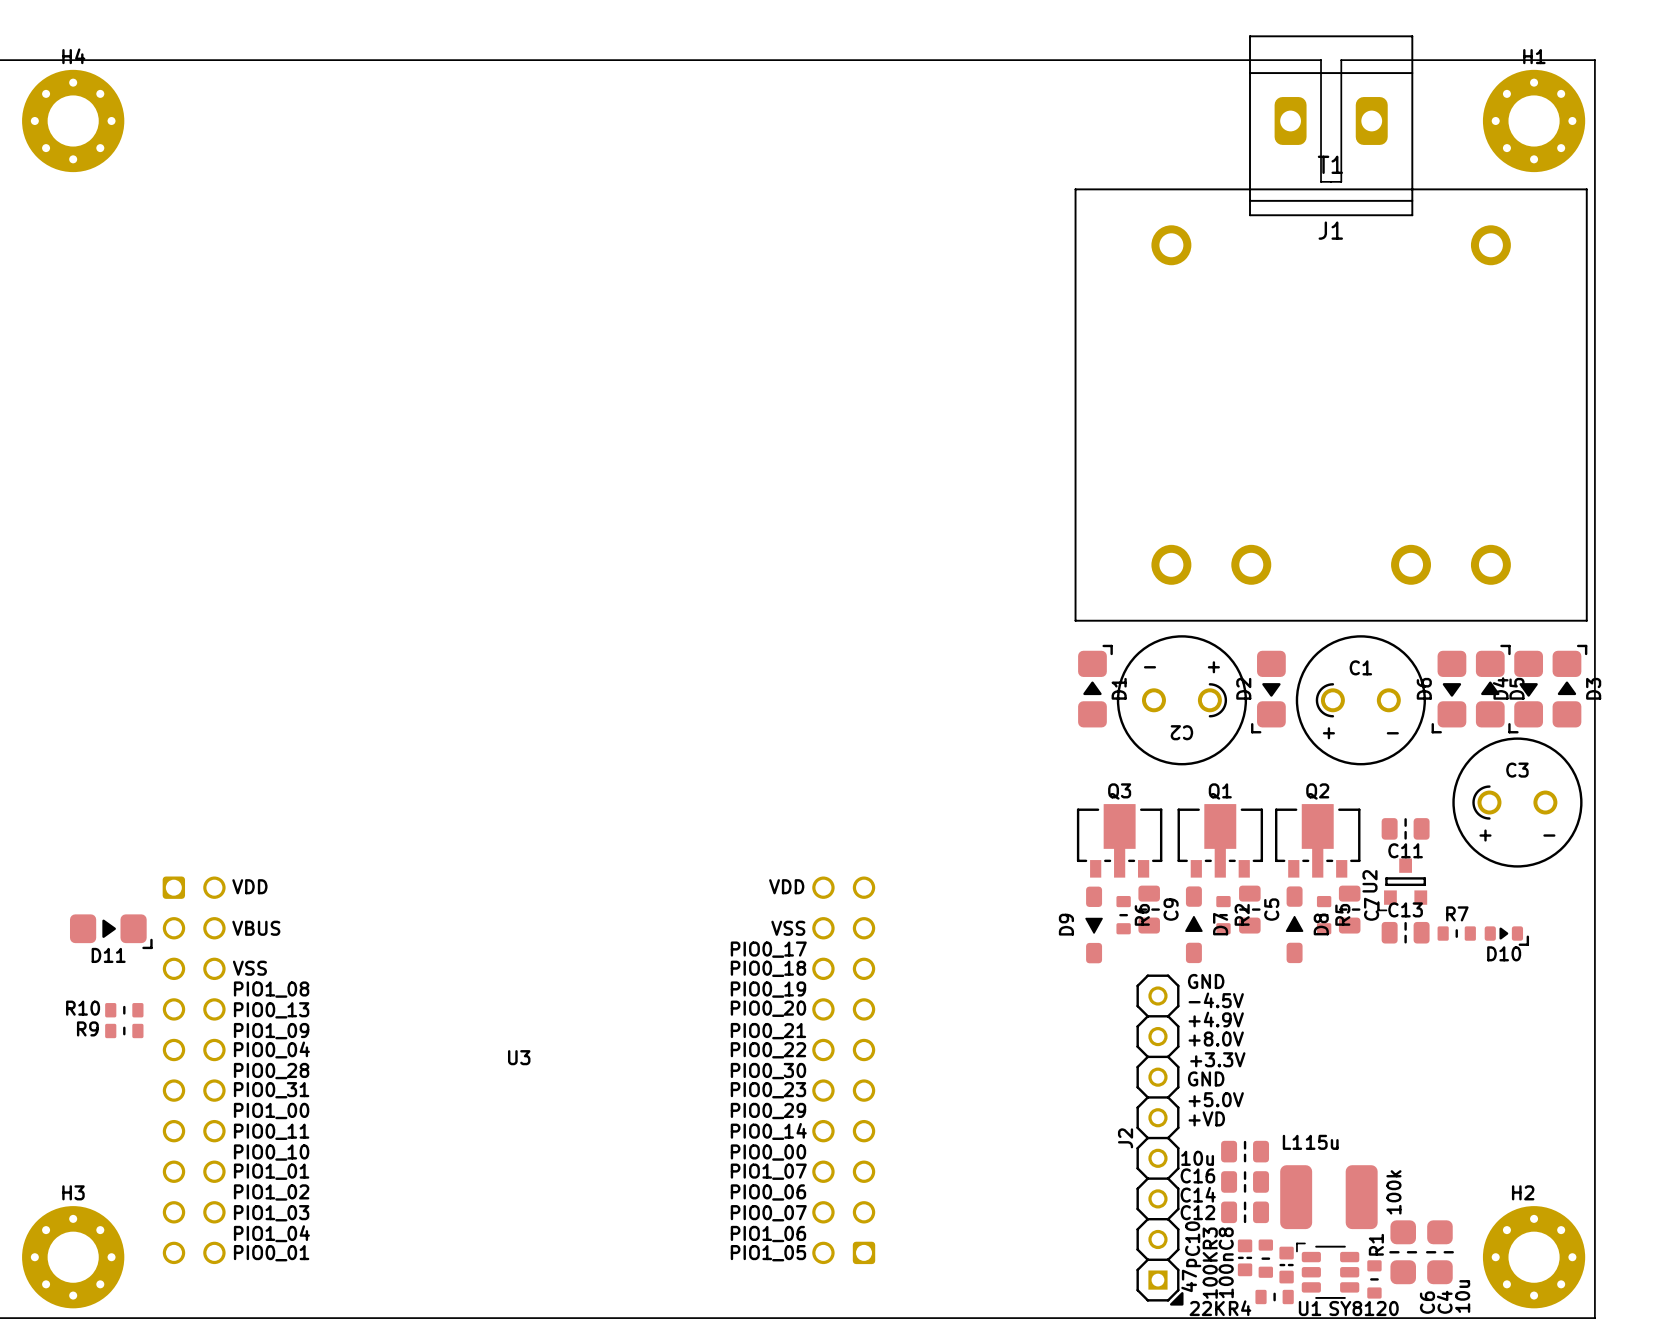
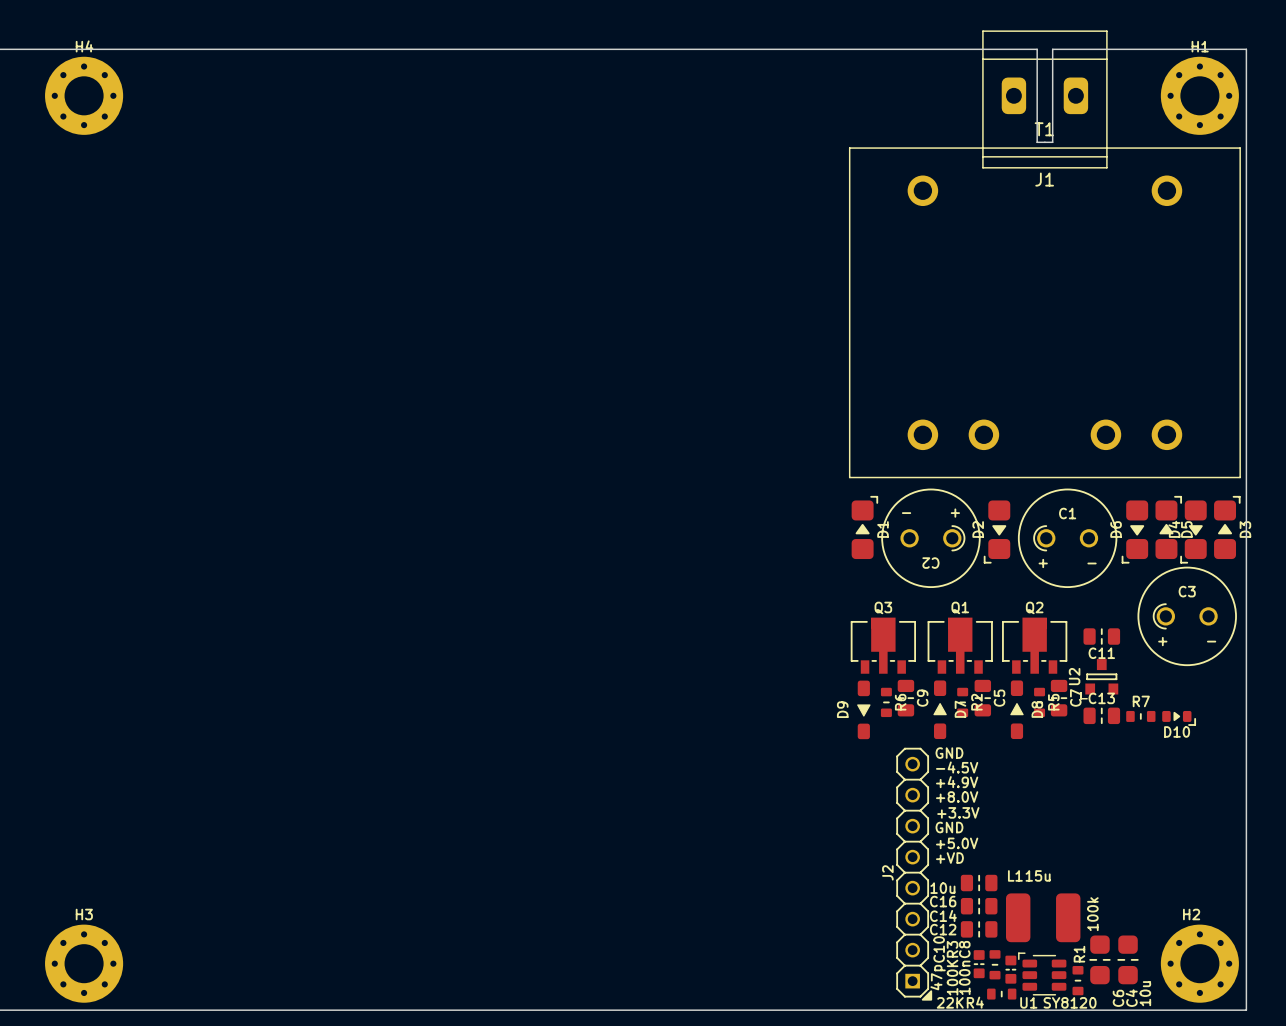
D11: (111, 931) -> none
R10: (124, 1010) -> none
R9: (124, 1030) -> none
U3: (518, 1070) -> none

